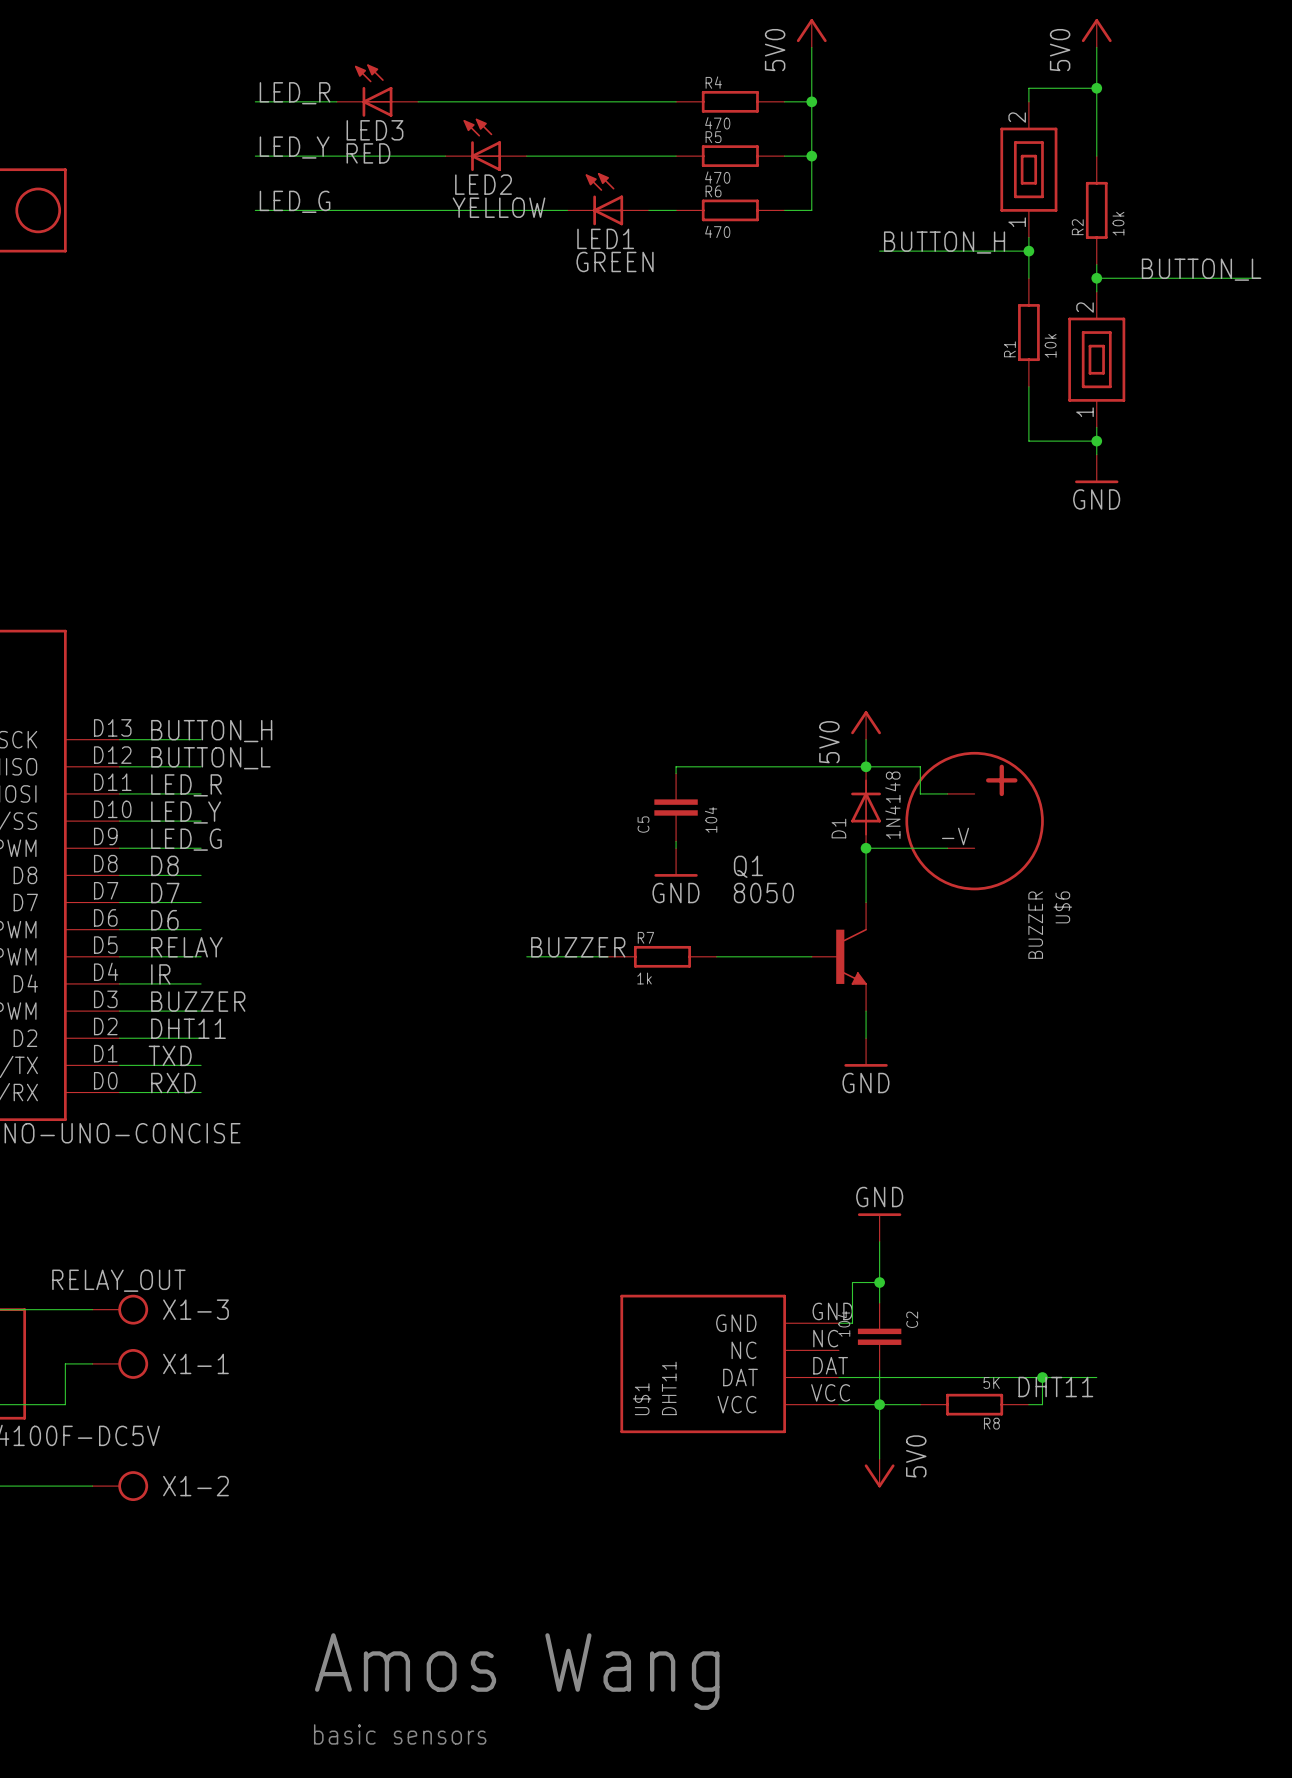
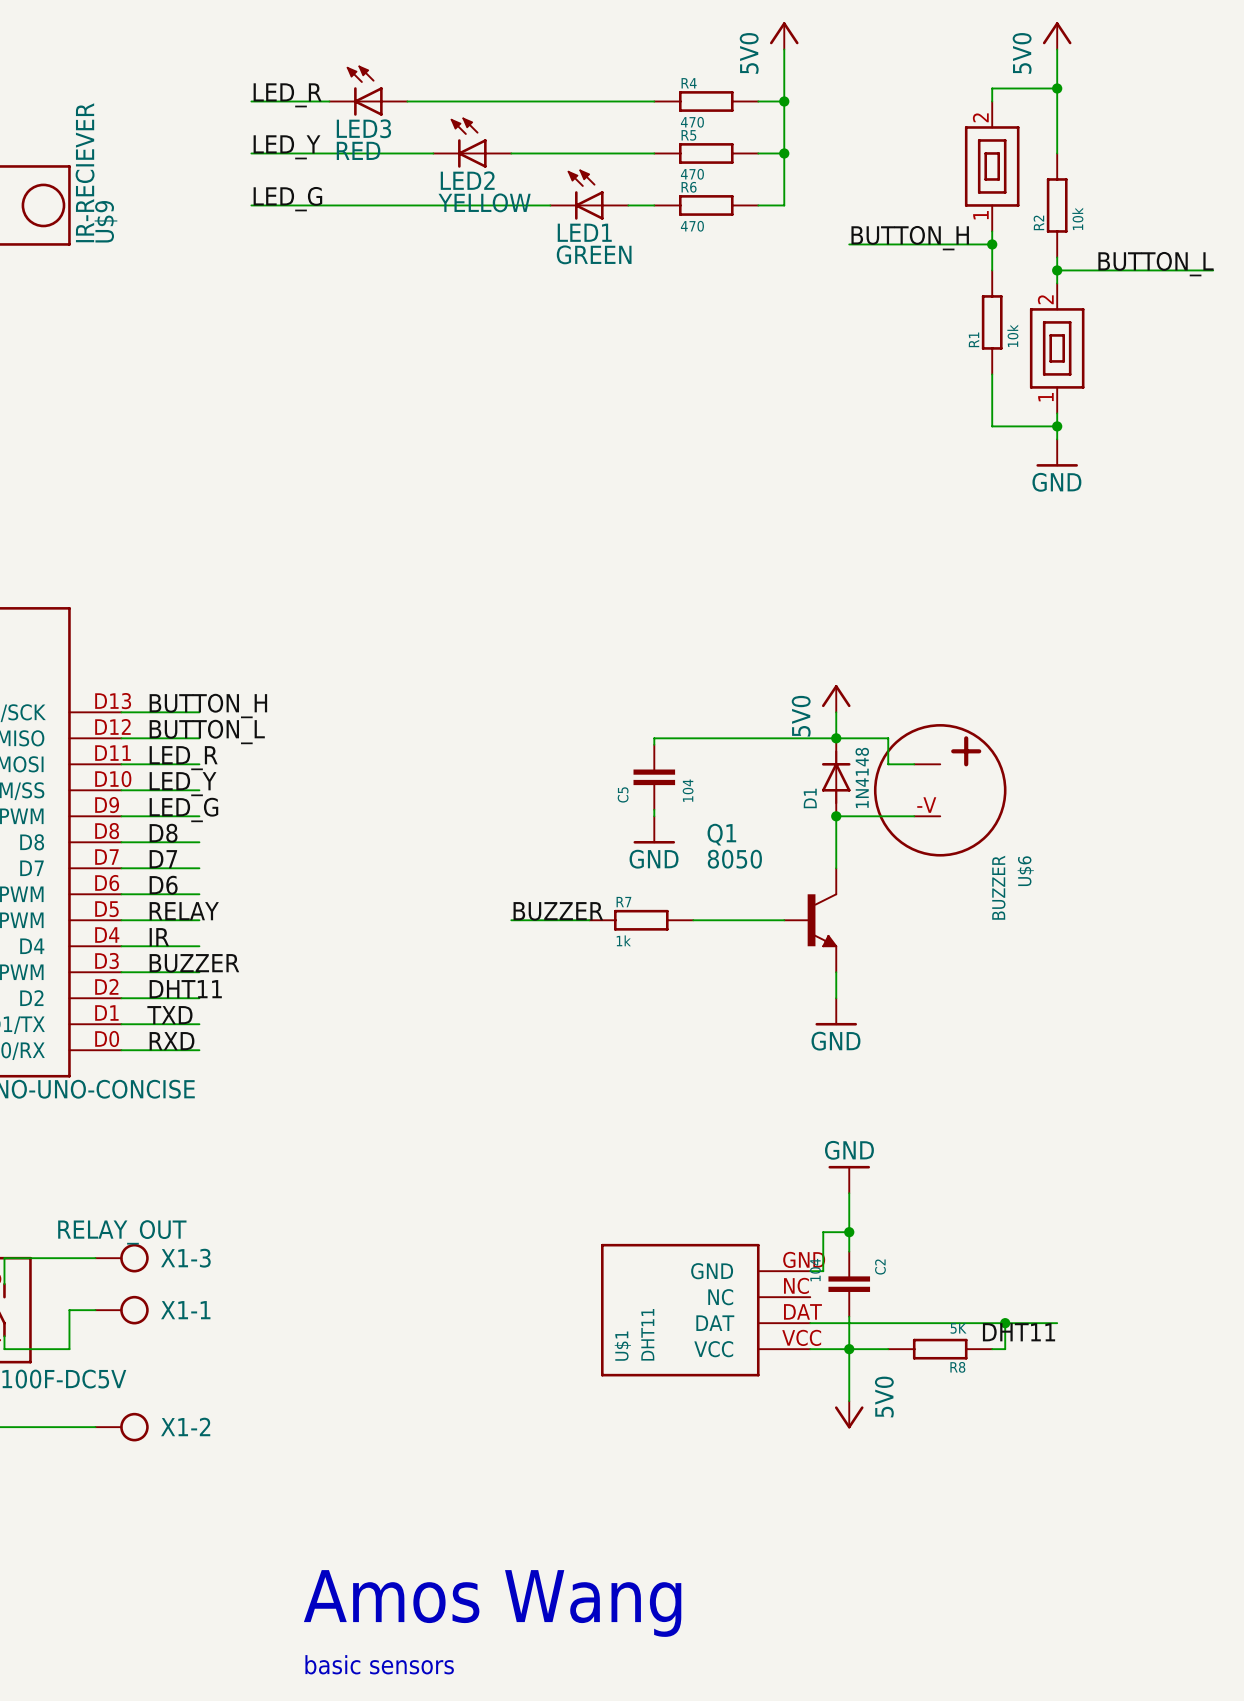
U$9 value: none -> IR-RECIEVER (85, 172)
U$9 name: none -> U$9 (105, 221)

